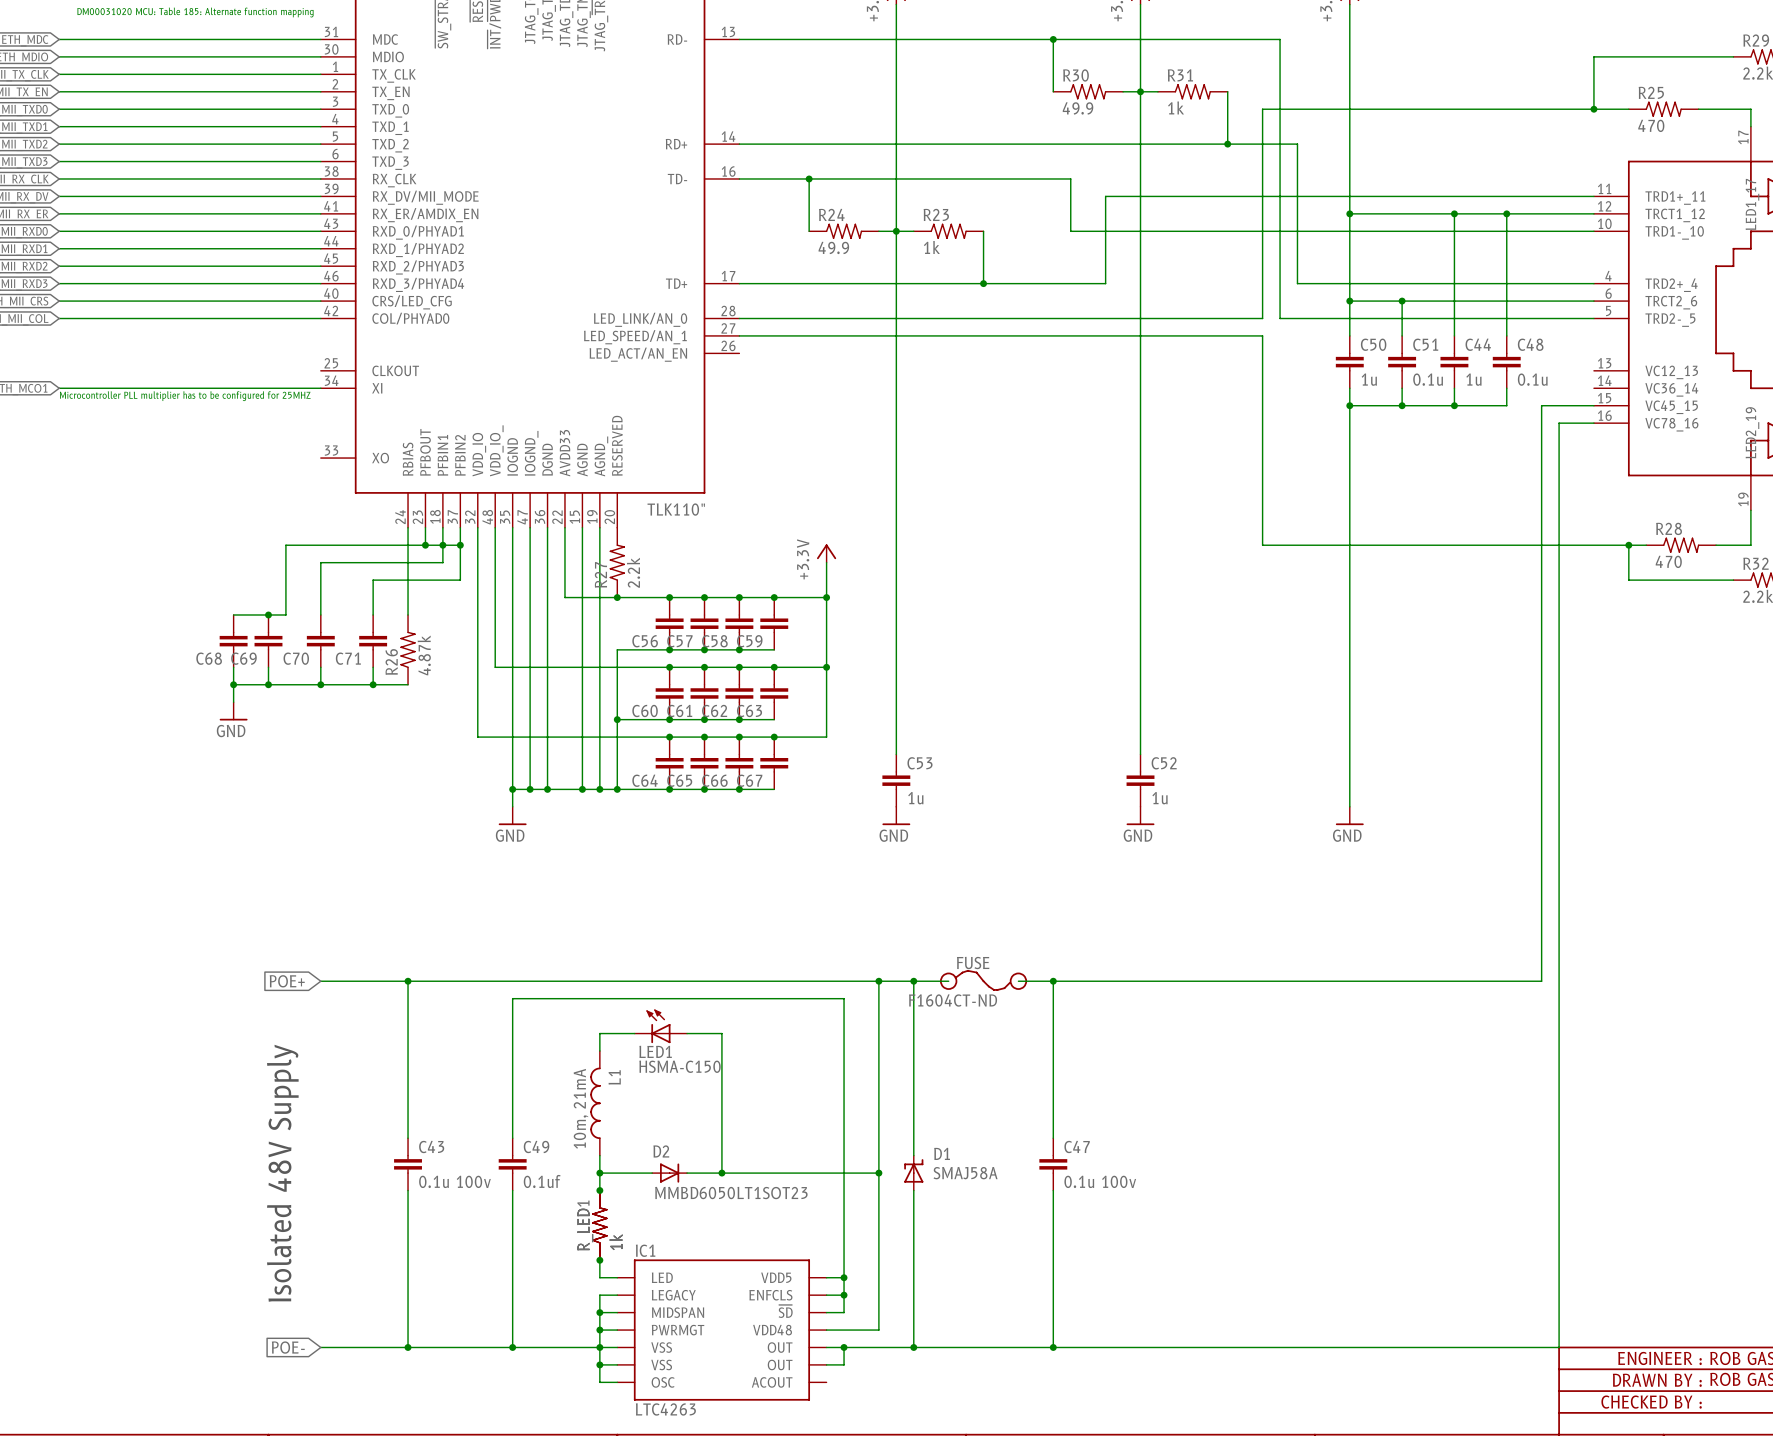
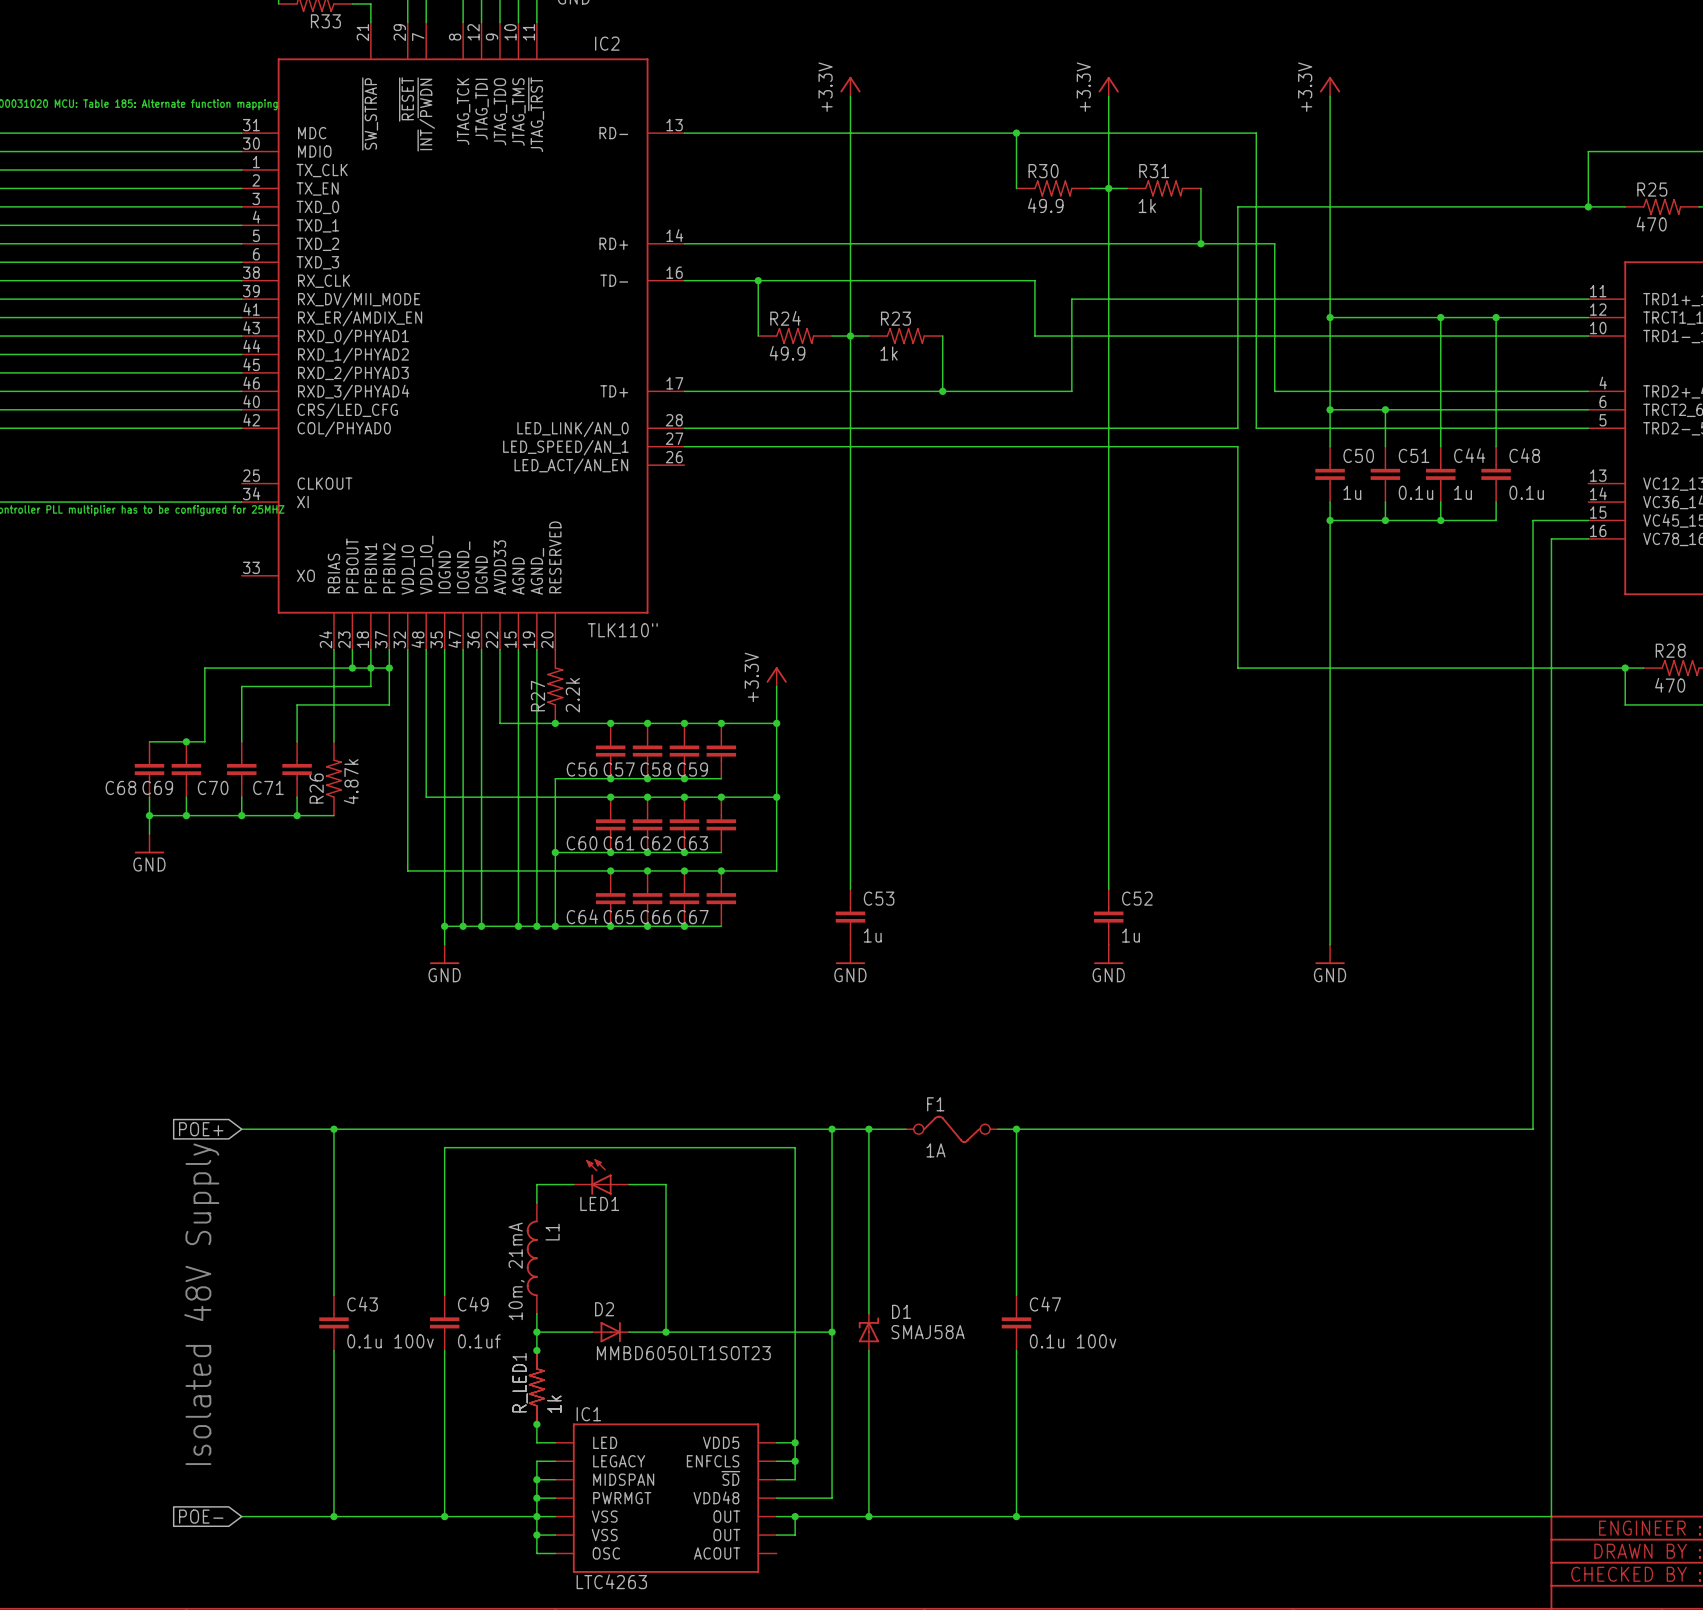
FUSE: F1604CT-ND (983, 980) -> none
F1: none -> 1A (951, 1129)
LED1 value: HSMA-C150 (680, 1066) -> none

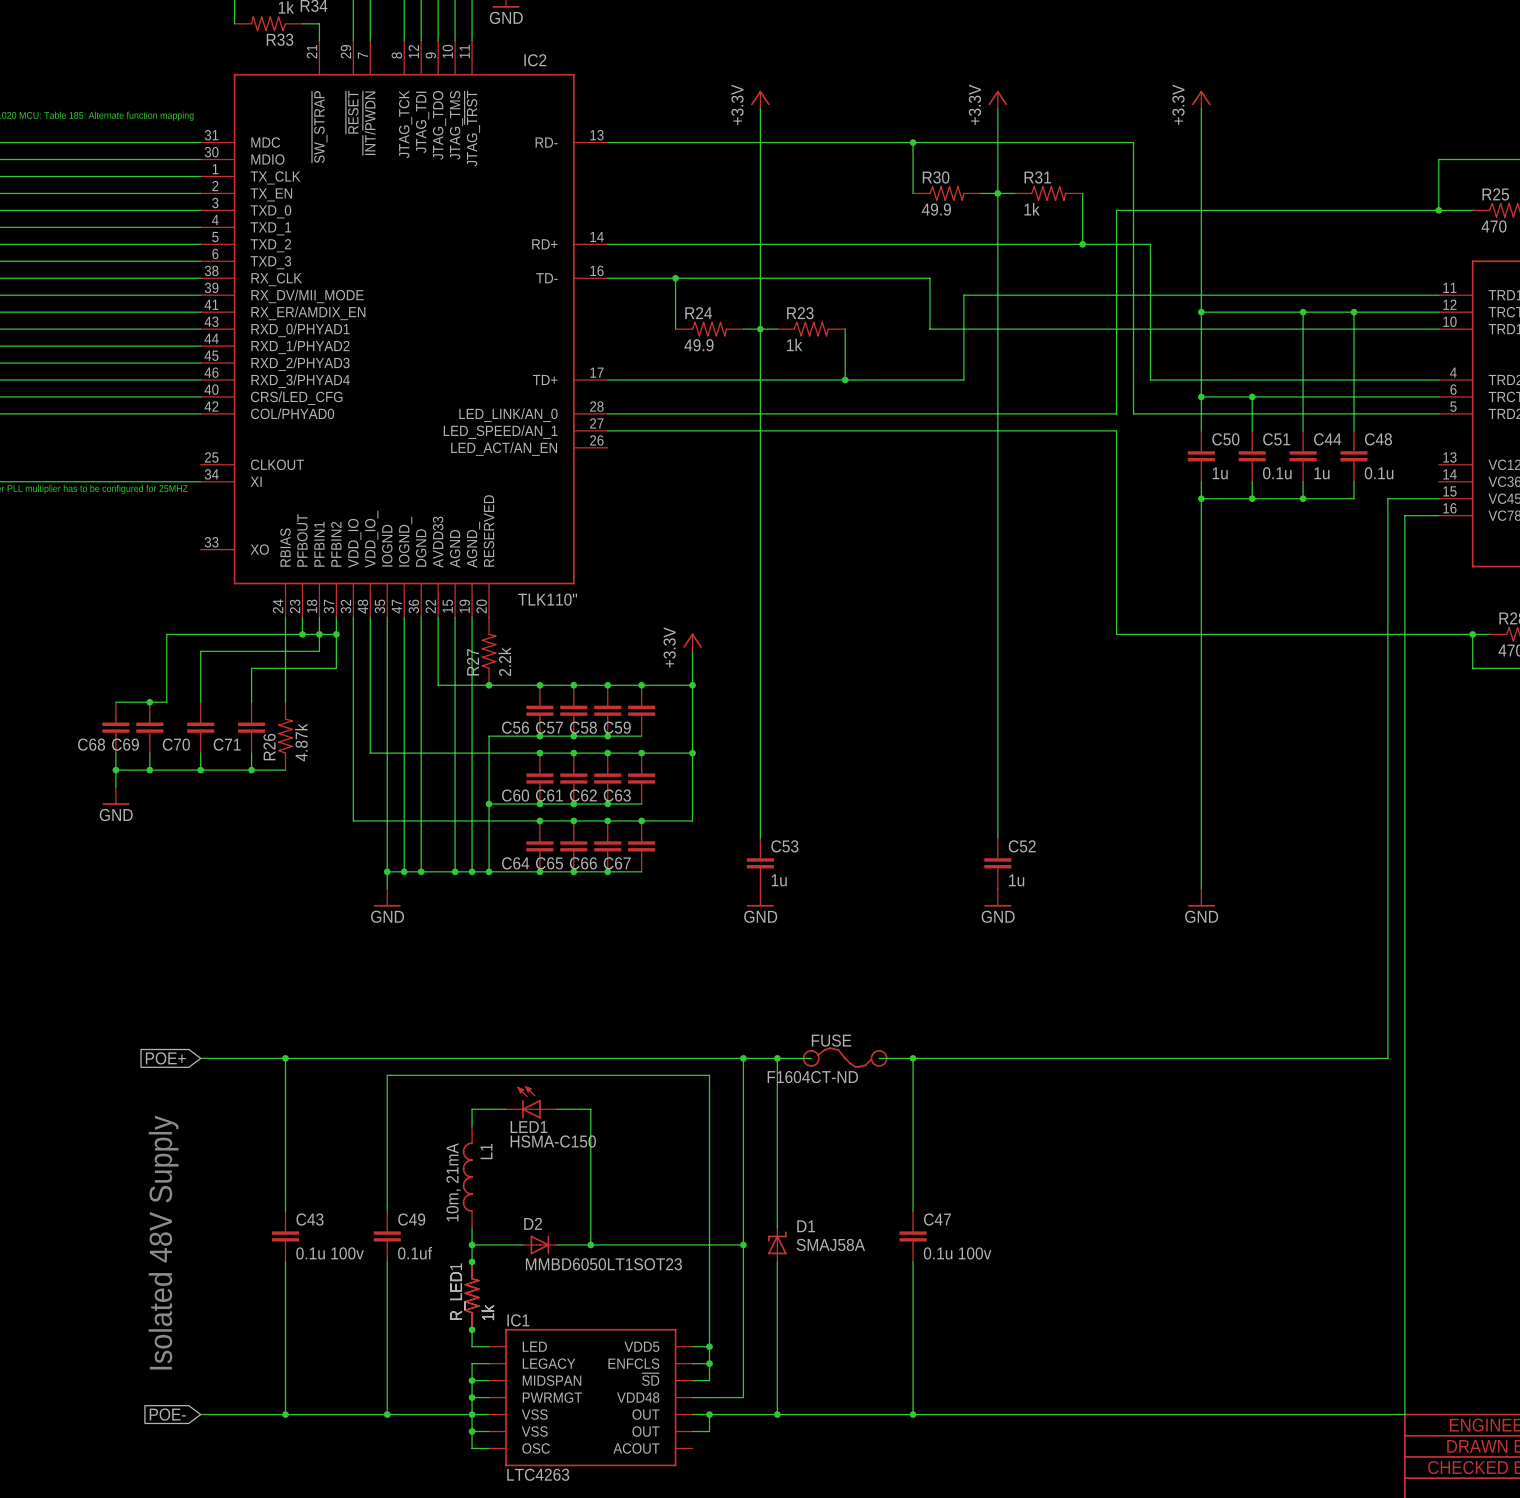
FUSE: none -> F1604CT-ND (845, 1057)
F1: 1A (951, 1129) -> none
LED1 value: none -> HSMA-C150 (553, 1141)

